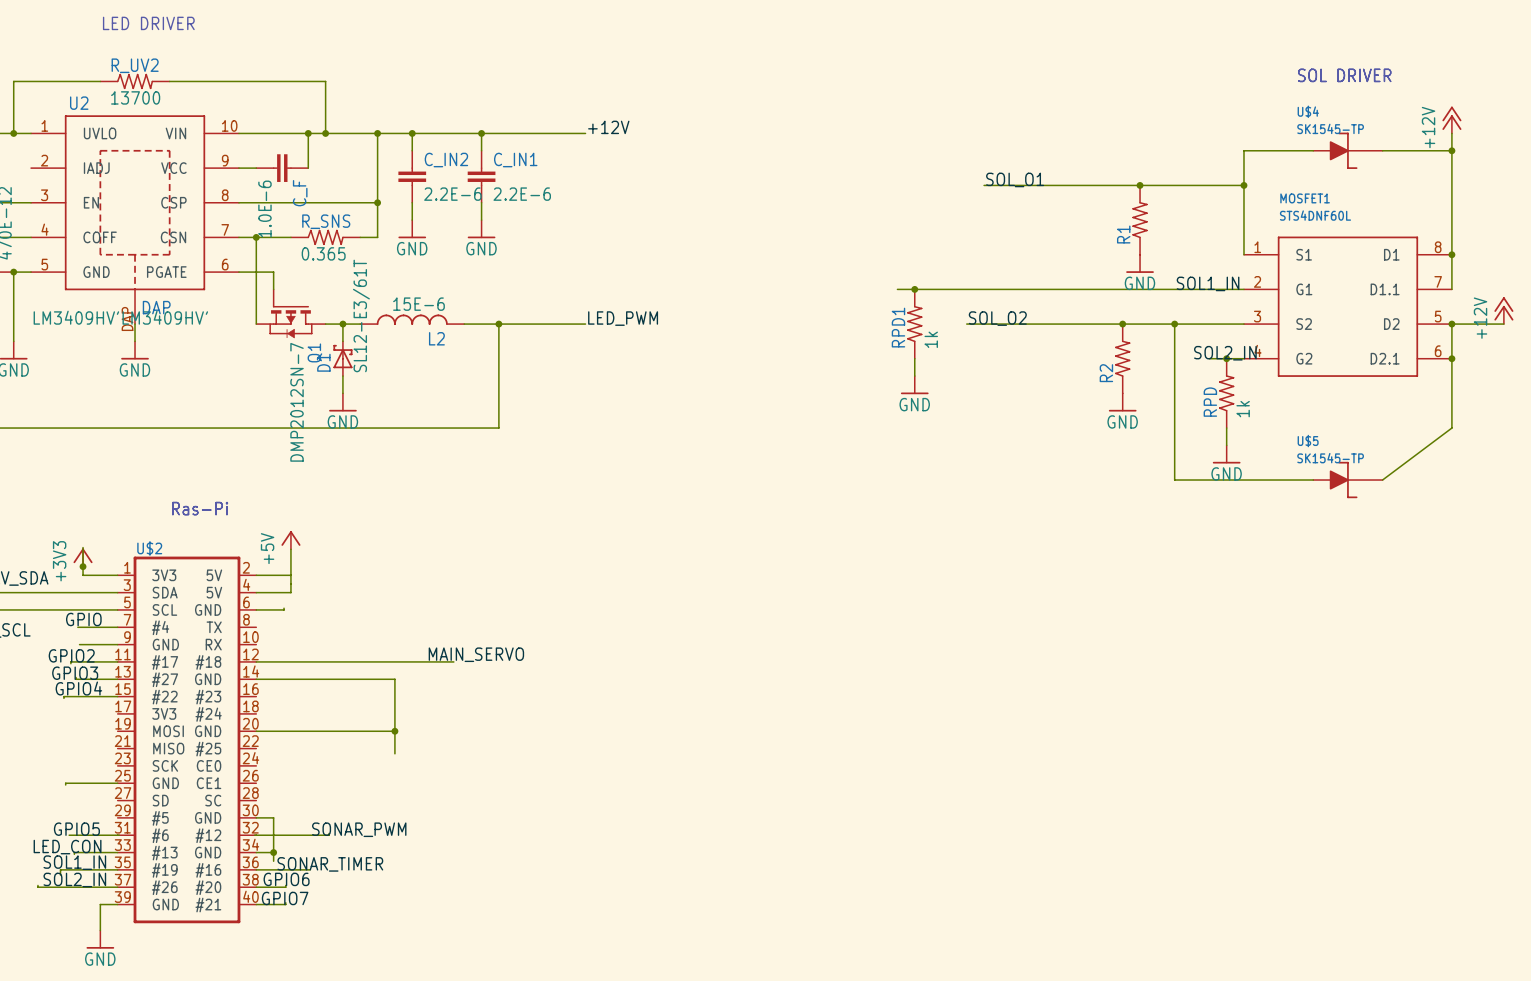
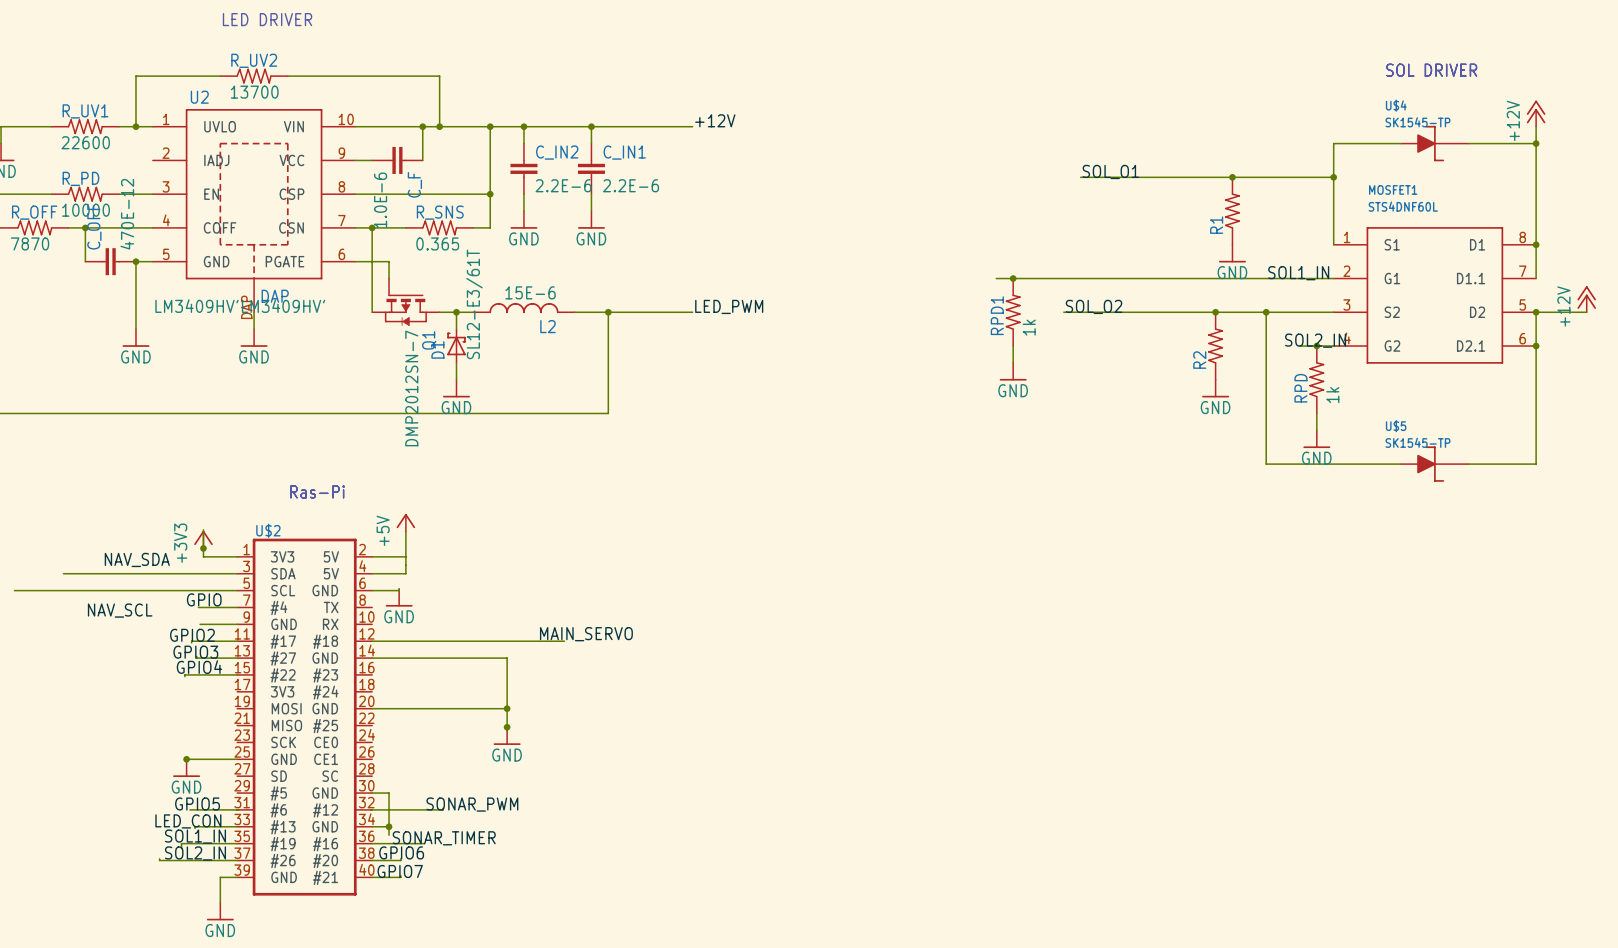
wire: (1451, 428) (1382, 480) -> (1536, 413) (1536, 464) (1468, 464)
power symbol: none -> GND (399, 597)
junction: none -> (507, 727)
power symbol: none -> GND (507, 736)
junction: none -> (186, 759)
power symbol: none -> GND (186, 768)

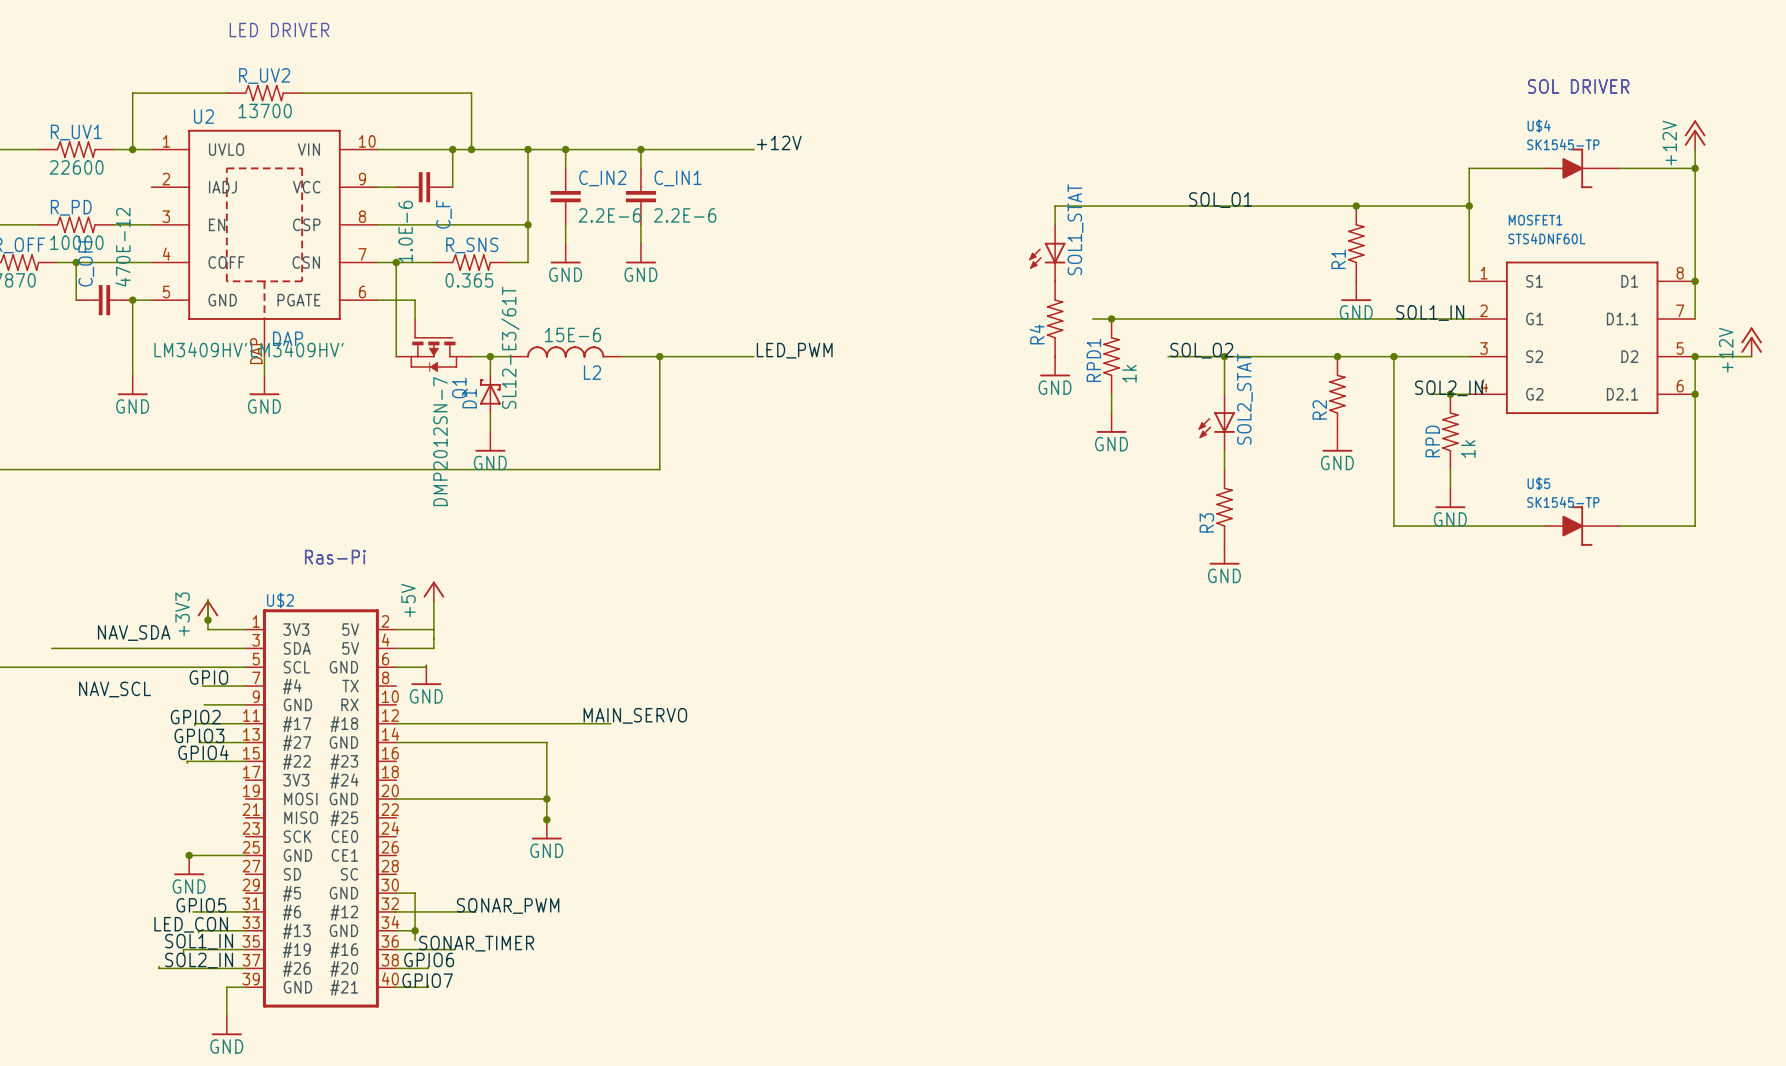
wire: none -> (1186, 206) (1055, 206) (1055, 224)
SOL1_STAT: none -> (1047, 253)
R4: none -> (1055, 318)
wire: none -> (1224, 356) (1224, 394)
junction: none -> (1224, 356)
power symbol: none -> GND (1055, 366)
SOL2_STAT: none -> (1216, 422)
wire: none -> (1224, 450) (1224, 469)
R3: none -> (1224, 507)
power symbol: none -> GND (1224, 554)

